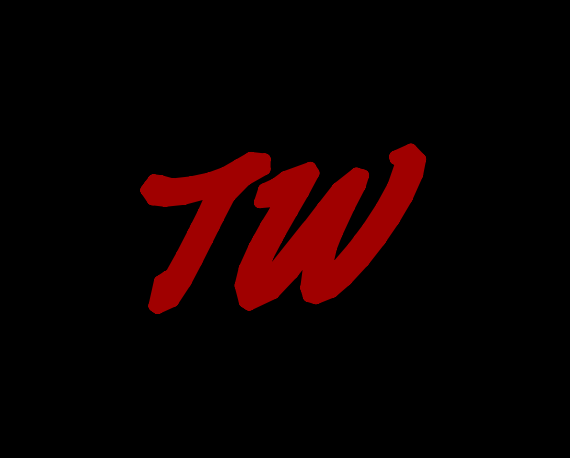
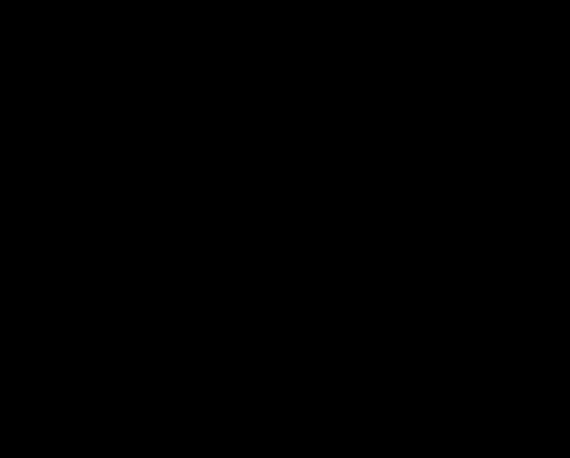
track: (250, 157) (224, 172) (209, 178) (172, 184) (153, 180) (146, 190) (152, 199) (165, 201) (183, 199) (212, 191) (169, 276) (159, 281) (154, 305) (157, 308) (173, 301) (185, 281) (229, 196) (245, 179) (264, 169) (264, 159) (250, 157) -> none
track: (407, 159) (410, 164) (403, 183) (383, 219) (359, 255) (339, 275) (328, 280) (325, 284) (321, 282) (315, 290) (322, 245) (318, 243) (338, 213) (352, 185) (337, 201) (287, 268) (274, 282) (252, 295) (250, 284) (256, 260) (267, 237) (278, 220) (287, 195) (295, 191) (301, 179) (268, 194) -> none
track: (157, 190) (166, 192) (180, 191) (212, 185) (231, 179) (255, 166) (217, 195) (190, 258) (181, 275) (171, 288) (169, 286) (163, 298) (173, 295) -> none
track: (308, 225) (337, 188) (356, 173) (363, 175) (330, 248) -> none
track: (307, 226) (272, 271) (259, 283) (267, 256) (313, 173) (310, 167) (285, 176) (264, 189) (259, 202) (277, 200) (282, 198) (254, 246) (244, 268) (240, 285) (244, 301) (249, 304) (273, 293) (315, 246) (308, 266) (306, 287) (308, 296) (315, 298) (332, 291) (346, 279) (379, 240) (406, 197) (417, 174) (420, 159) (410, 149) (395, 156) (400, 163) (393, 185) (368, 227) (337, 265) (325, 272) (330, 250) -> none

